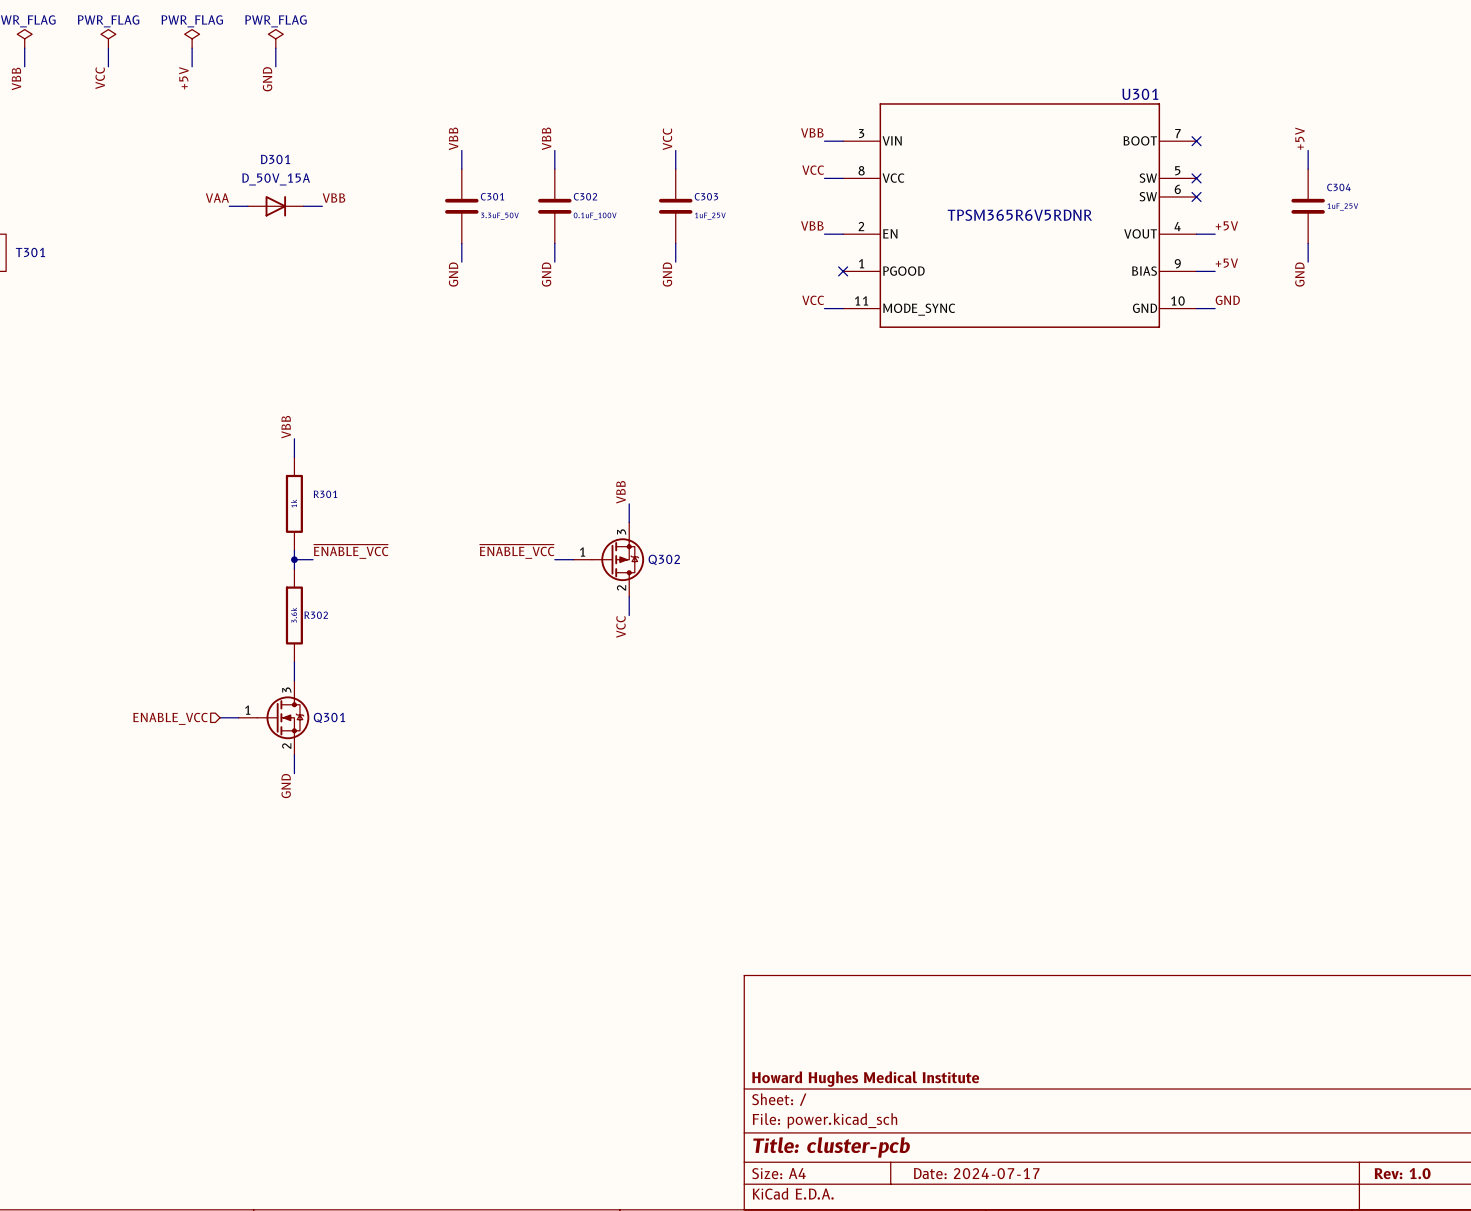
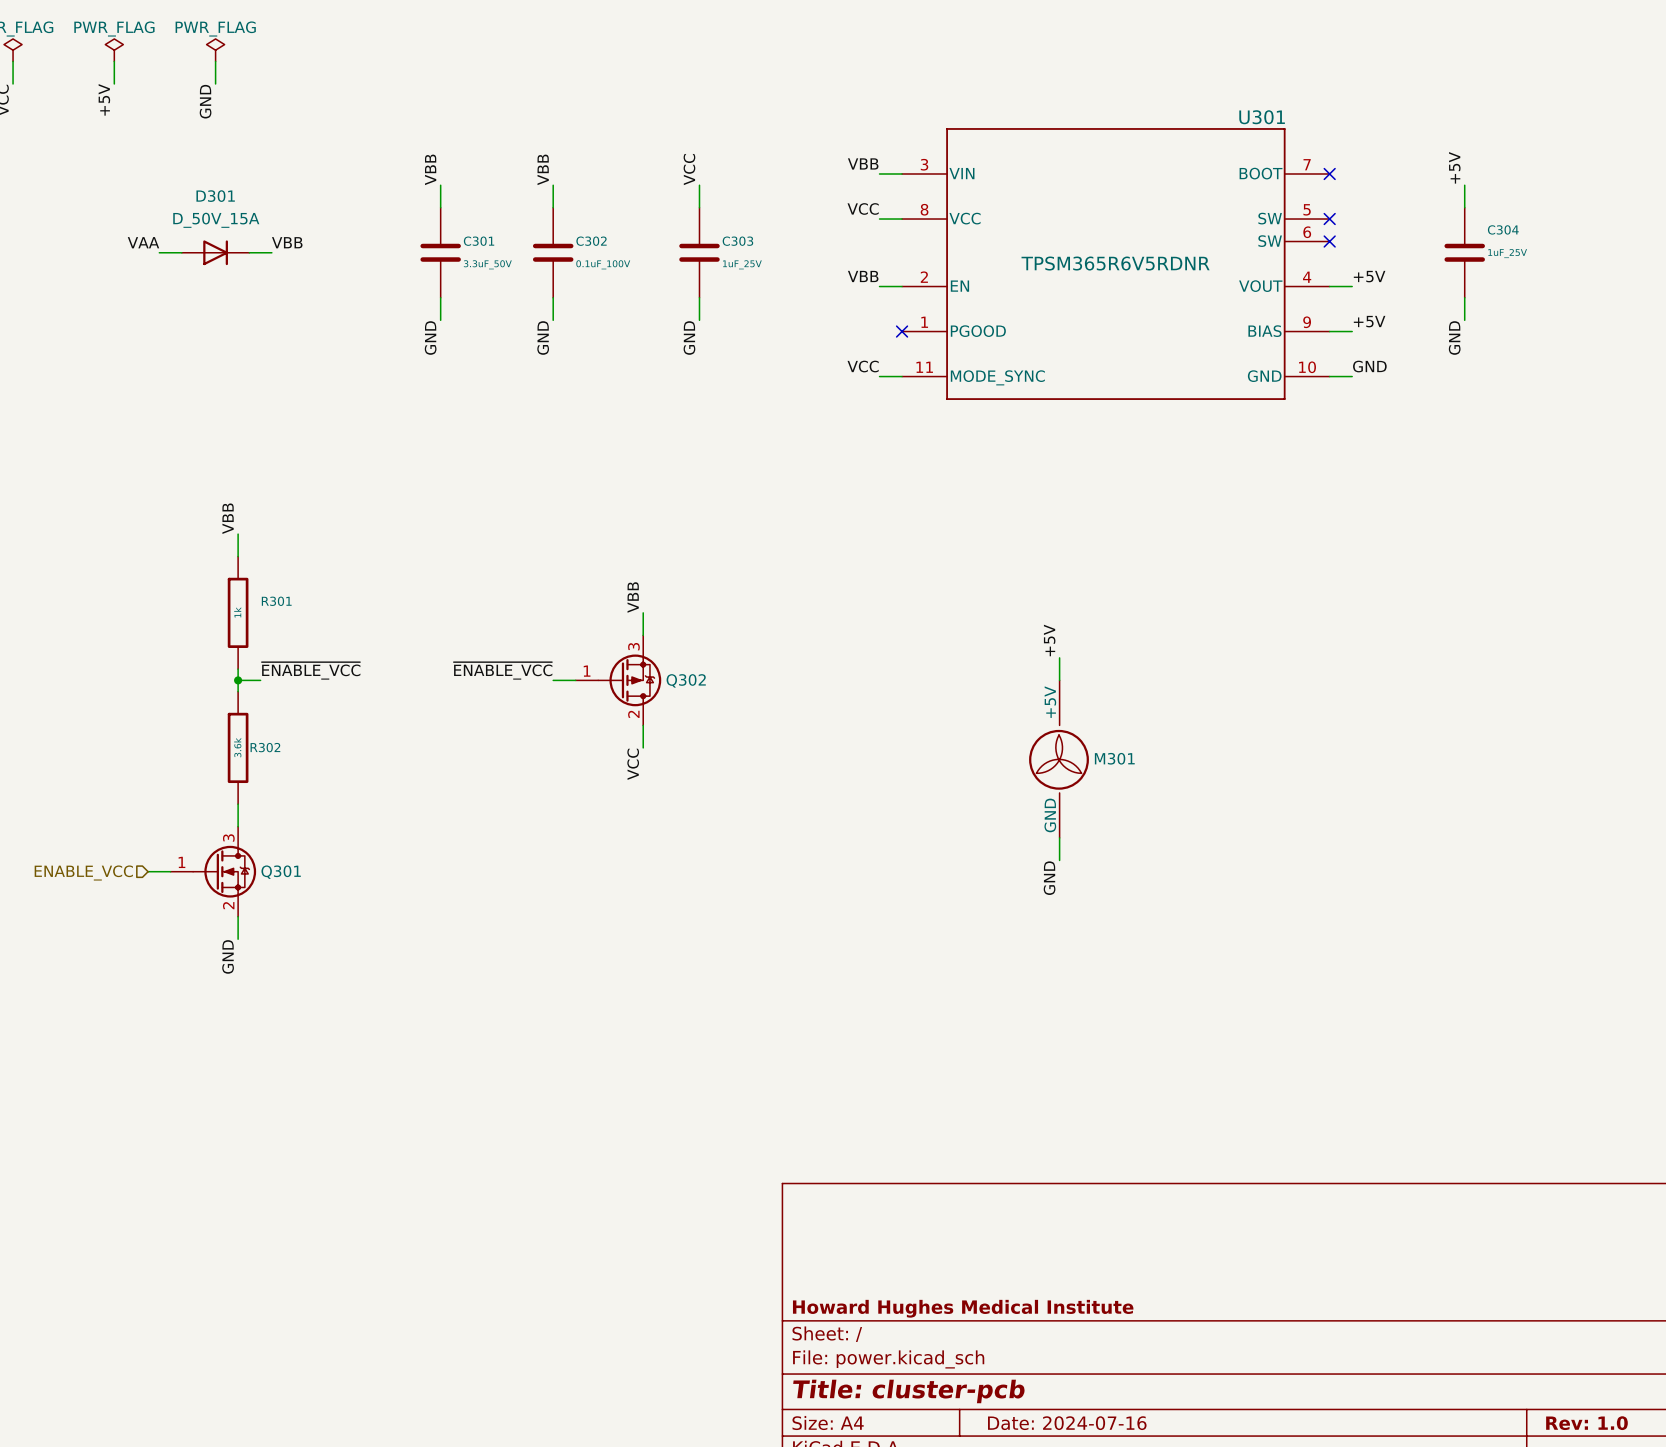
label: none -> +5V (1049, 640)
wire: none -> (1059, 657) (1059, 680)
M301: none -> (1059, 759)
wire: none -> (1059, 837) (1059, 860)
label: none -> GND (1049, 878)
title block: Date: 2024-07-17 (976, 1173) -> Date: 2024-07-16 (1067, 1423)

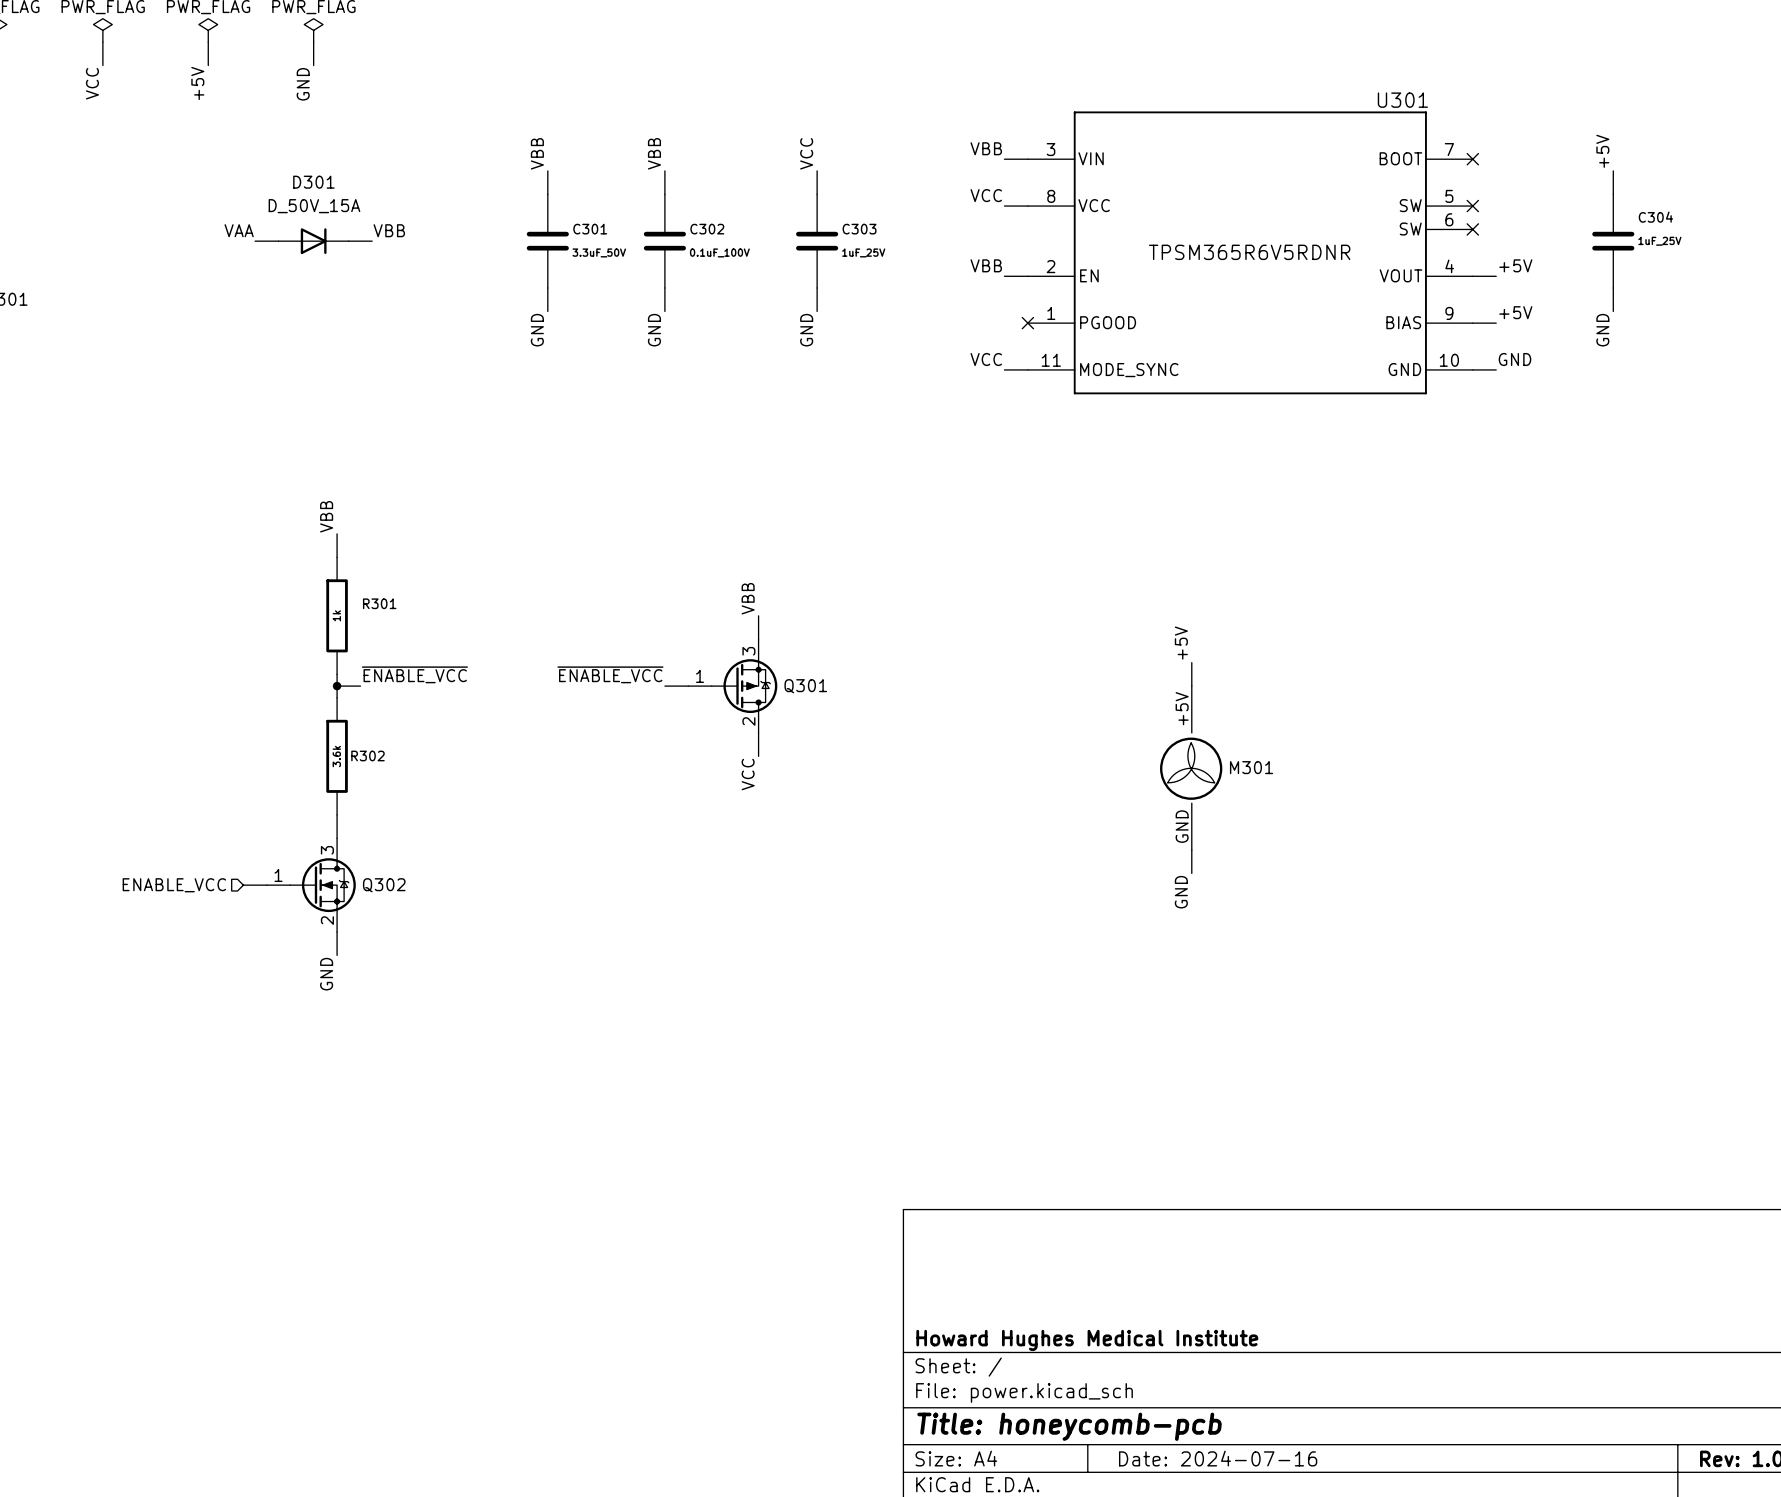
Q302 name: Q302 (686, 680) -> Q301 (805, 686)
Q301 name: Q301 (281, 872) -> Q302 (384, 885)
title block: Title: cluster-pcb (909, 1391) -> Title: honeycomb-pcb (1069, 1426)

